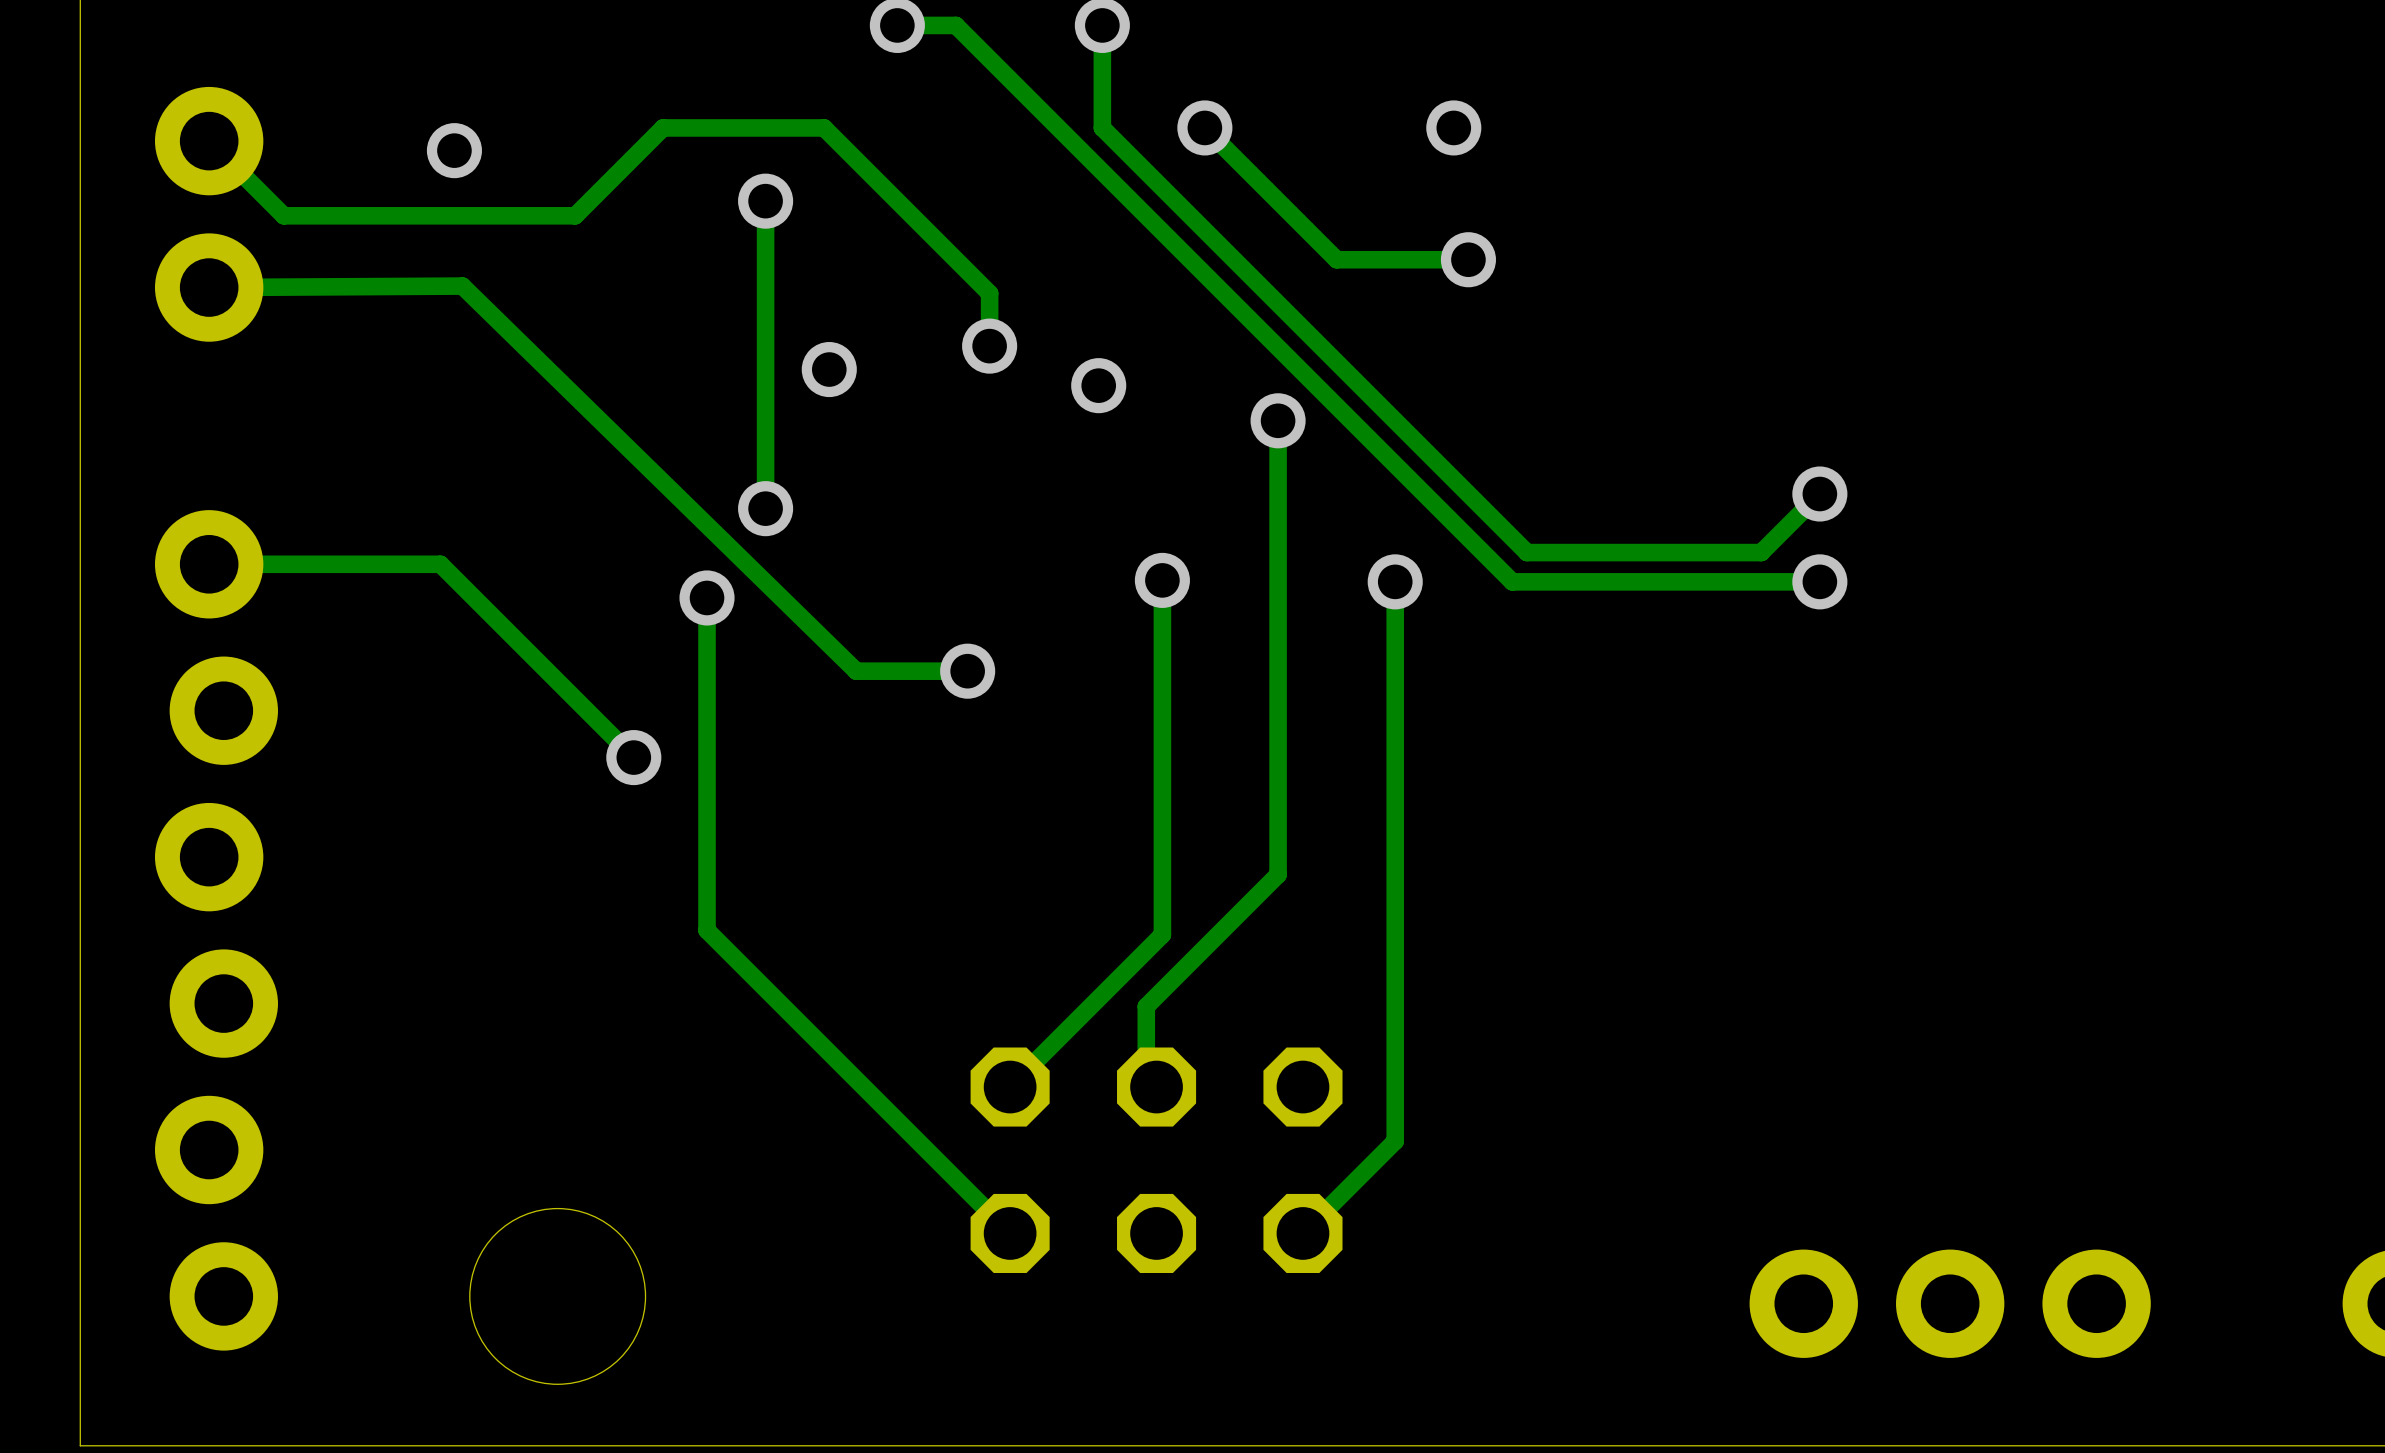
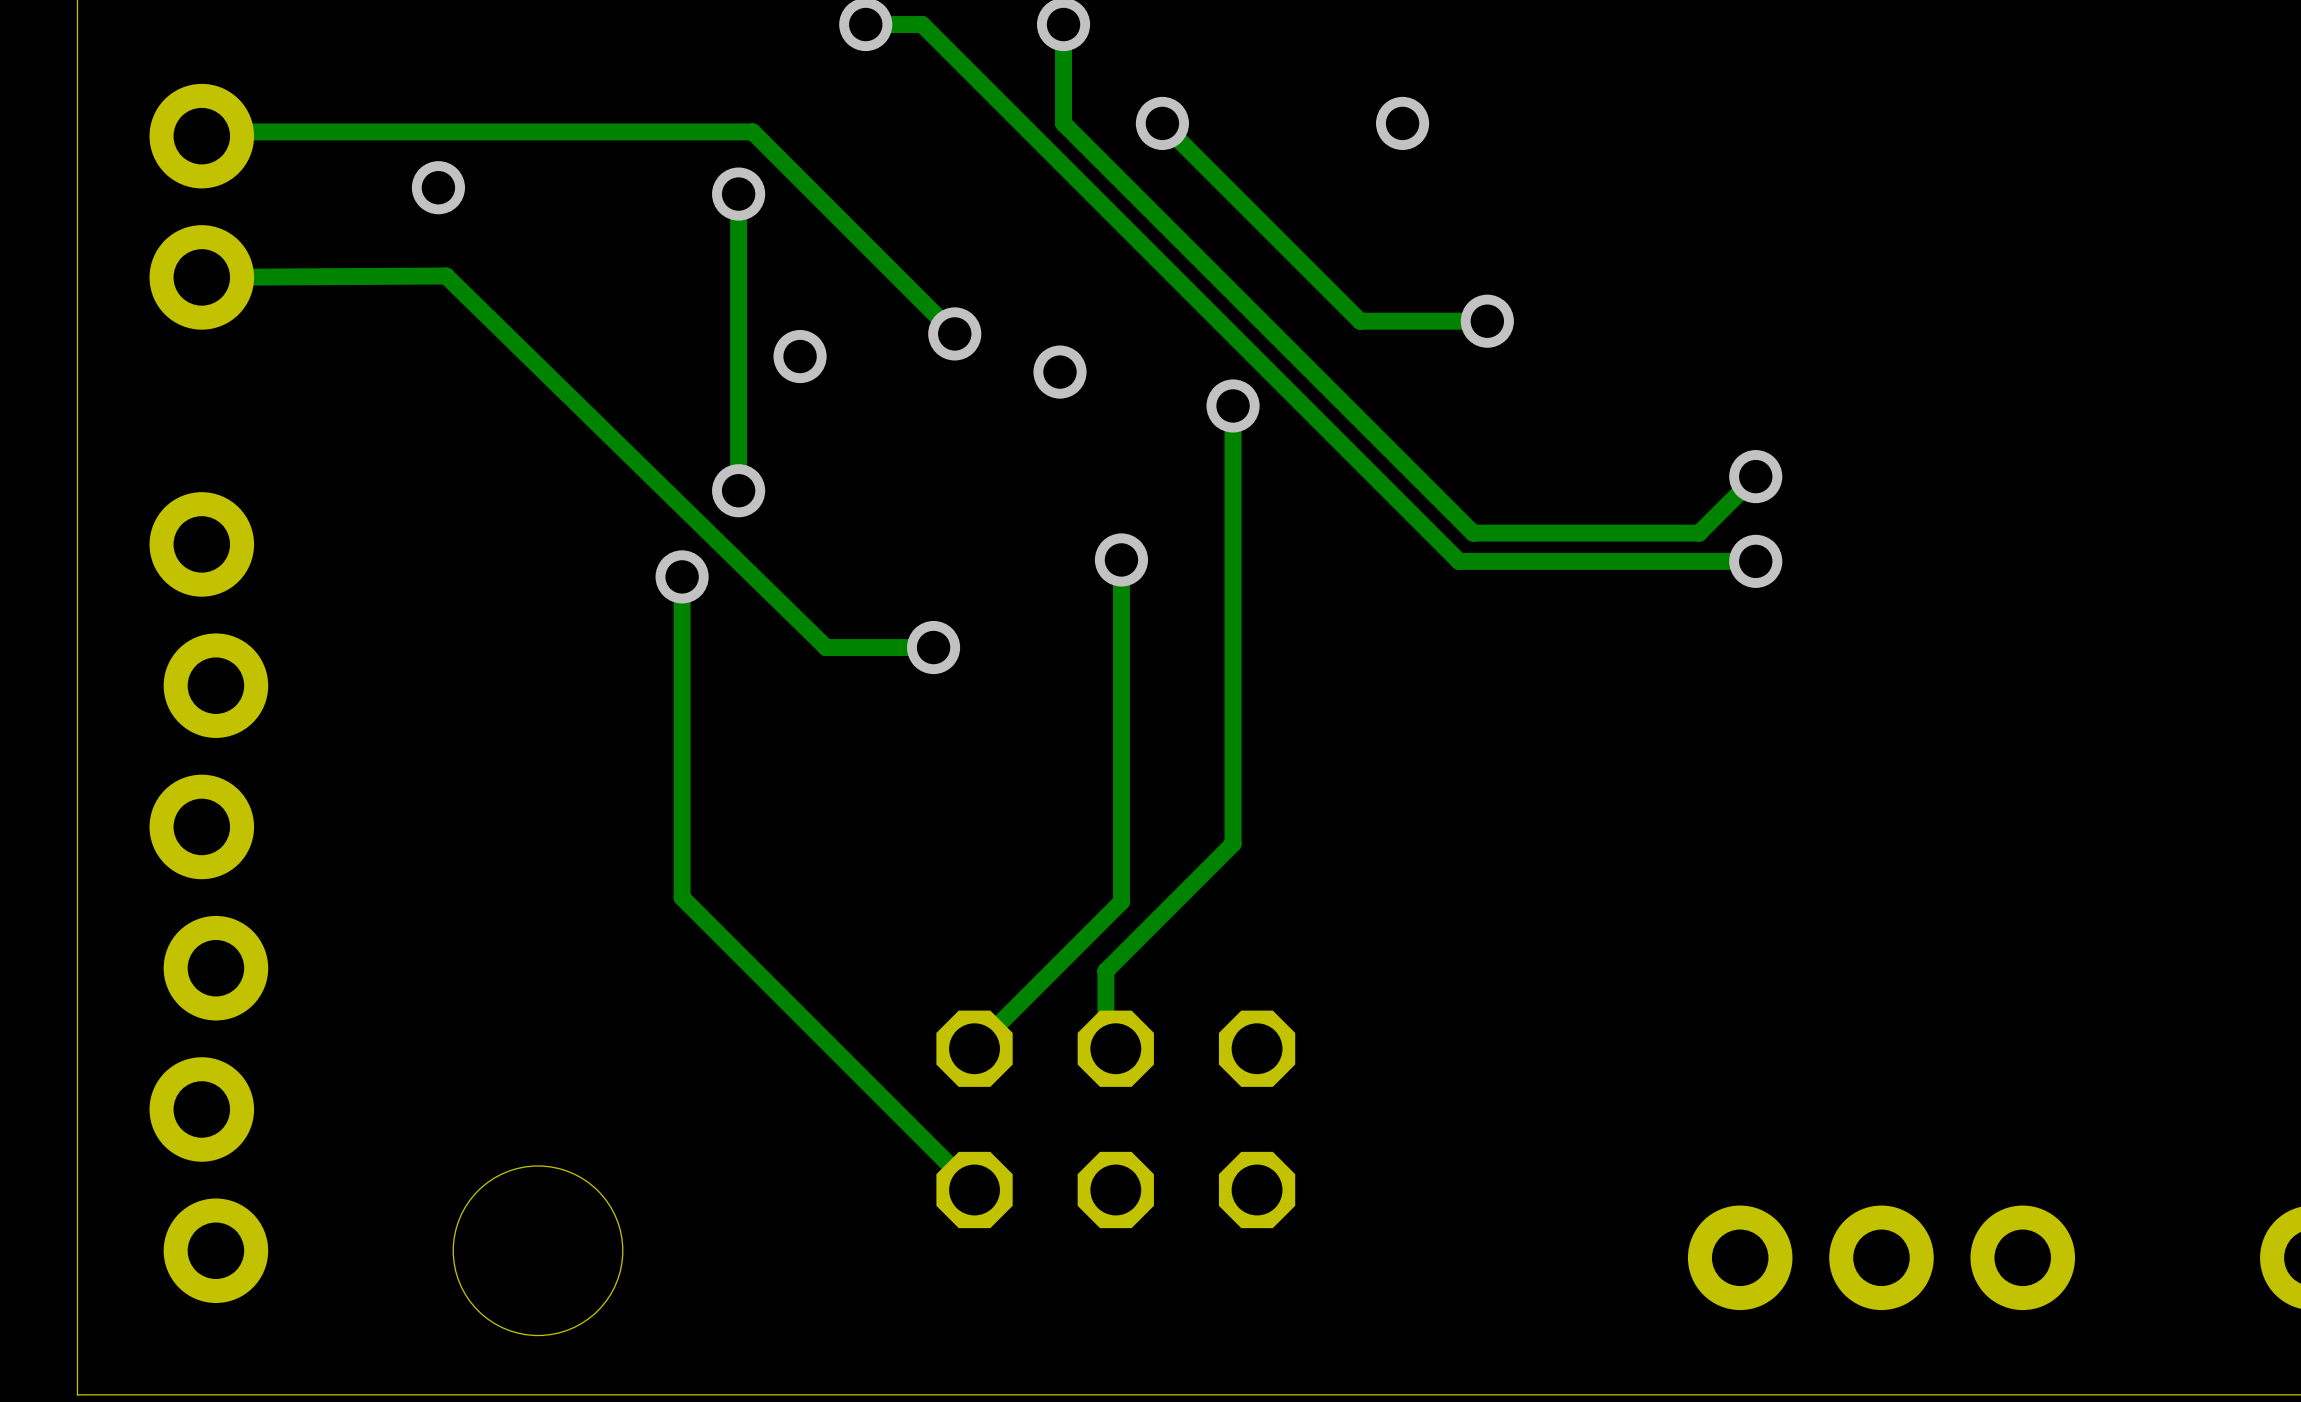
track: (209, 141) (283, 215) (575, 215) (663, 127) (824, 127) (989, 293) (989, 346) -> (201, 136) (211, 131) (752, 131) (954, 333)
via position: (454, 150) -> (438, 187)
track: (1468, 259) (1336, 259) -> (1487, 321) (1360, 321) (1289, 250)
via position: (1468, 259) -> (1487, 321)
track: (209, 564) (440, 564) (633, 757) -> none
track: (1395, 581) (1395, 1141) (1302, 1233) -> none
via: (1395, 581) -> none
via: (633, 757) -> none

